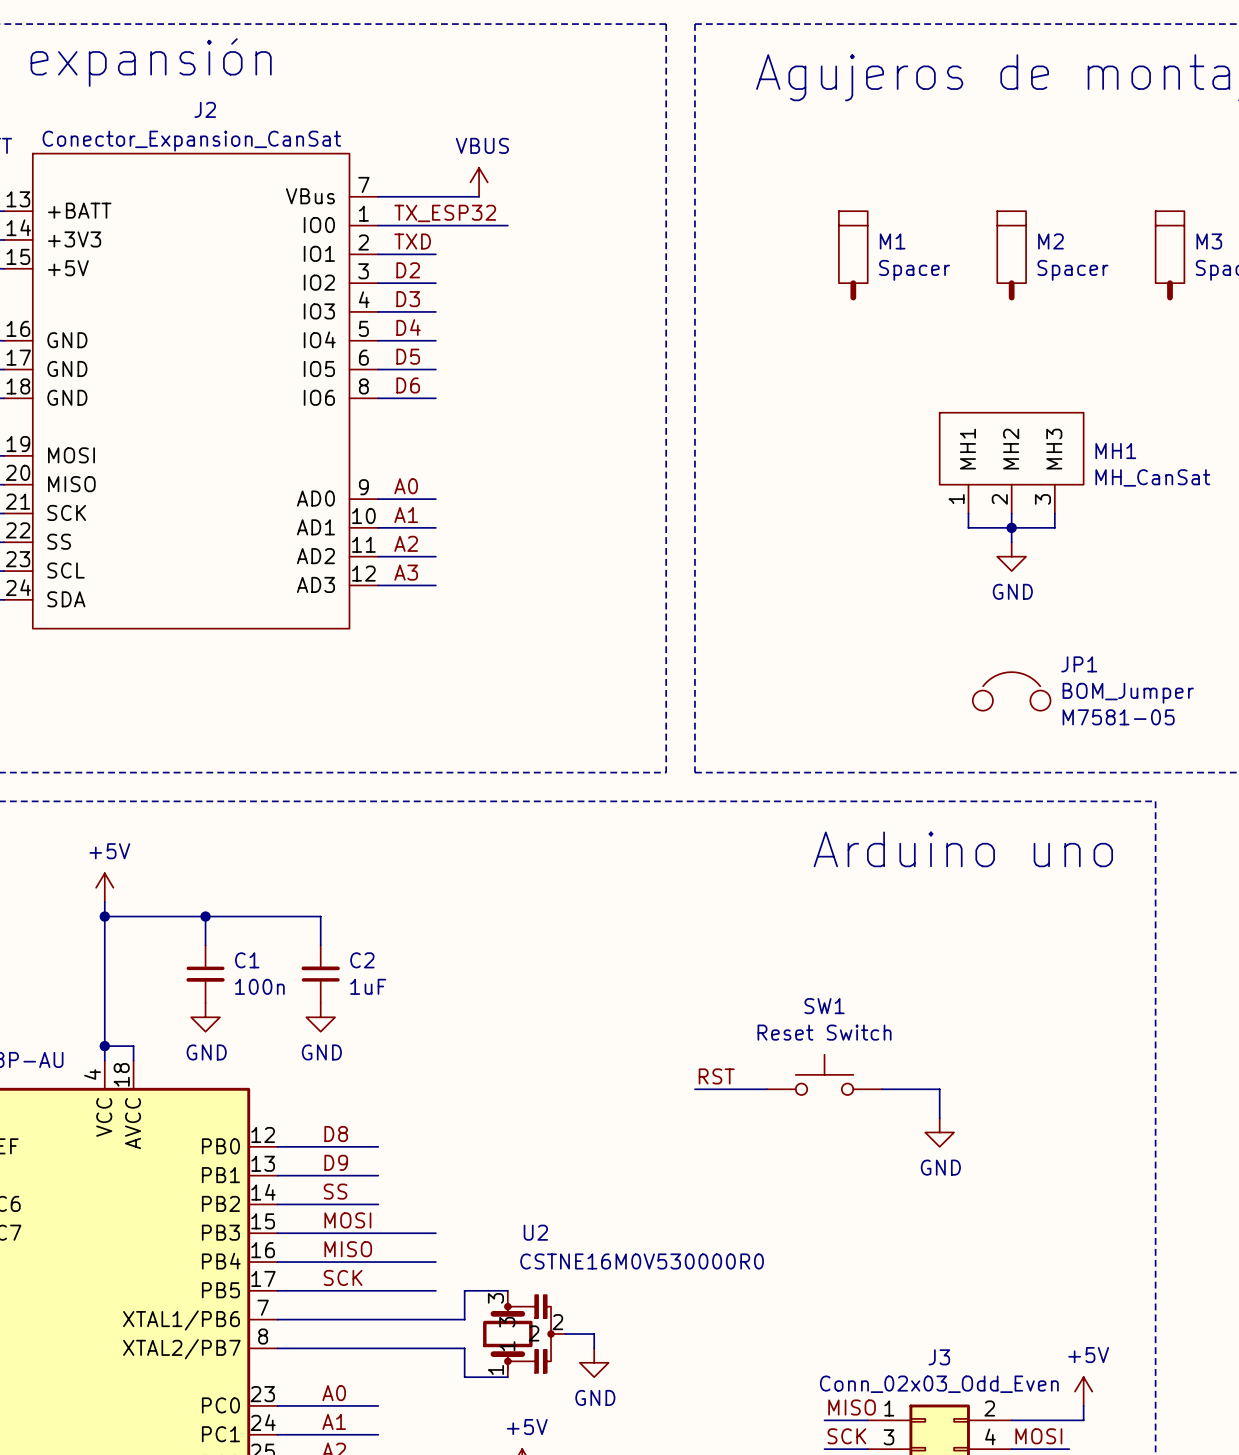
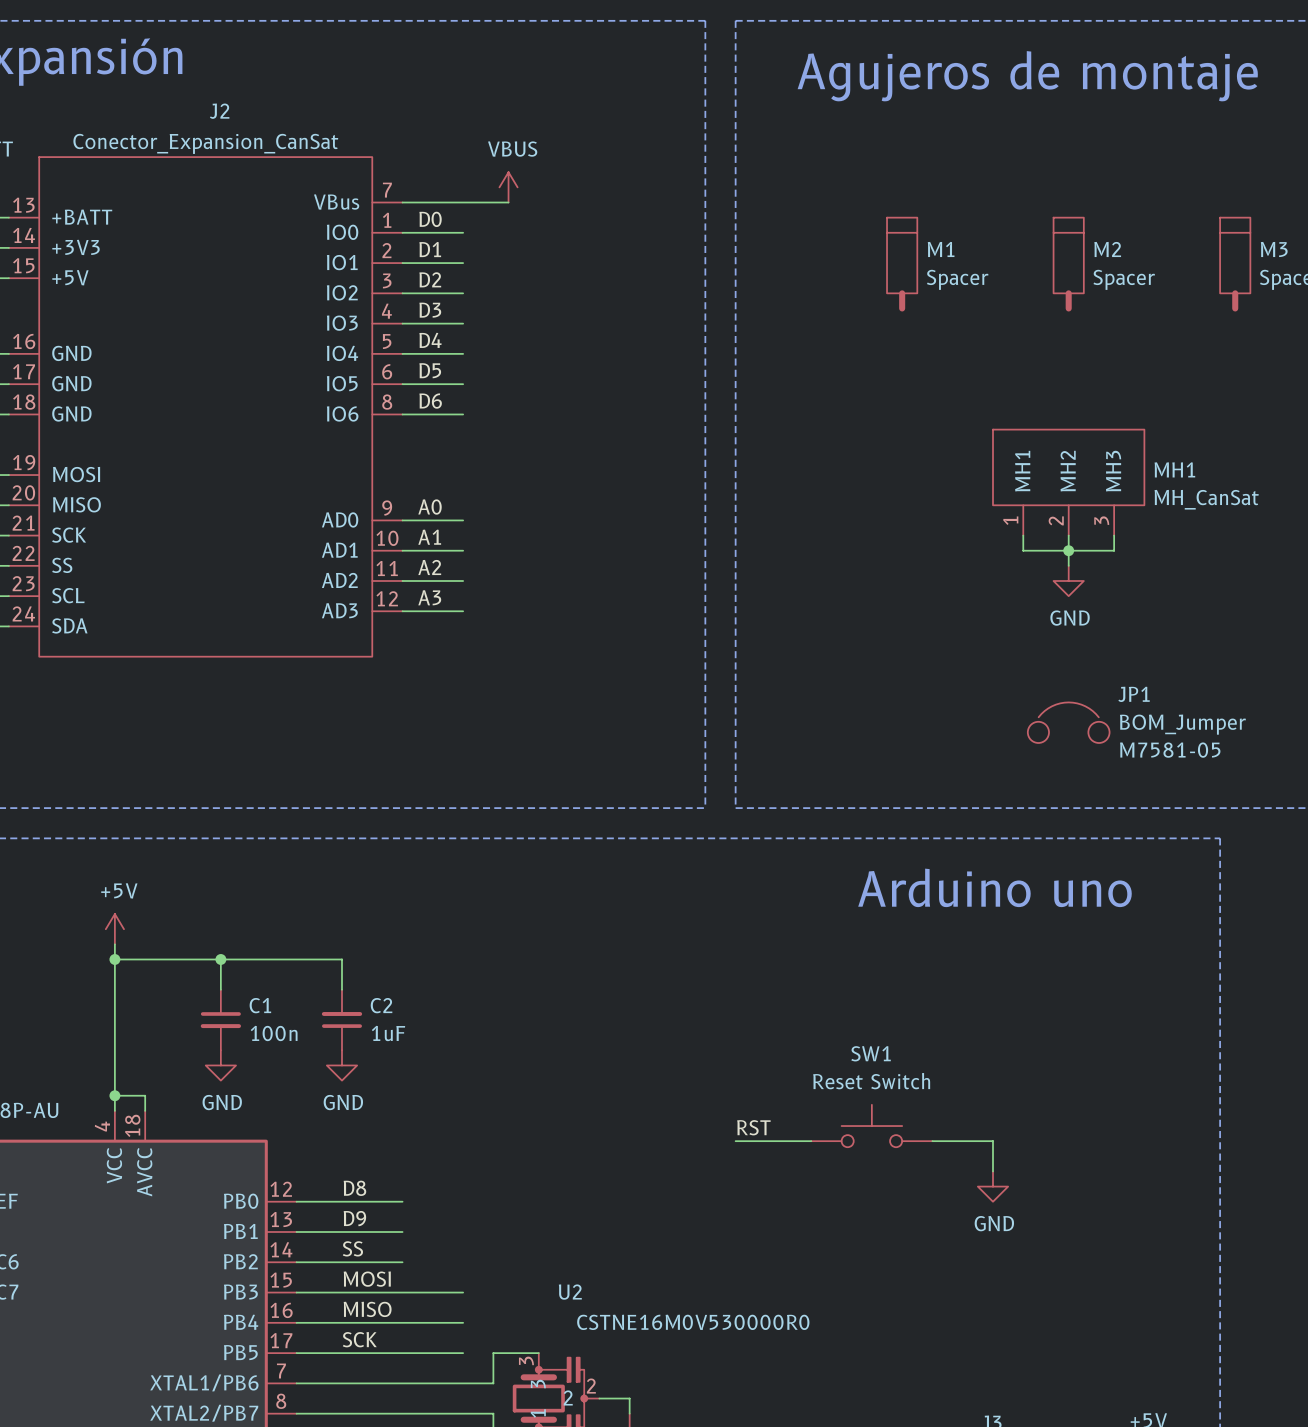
label: TX_ESP32 (445, 213) -> D0 (430, 219)
wire: (435, 225) (507, 225) -> none
label: TXD (412, 241) -> D1 (430, 249)

